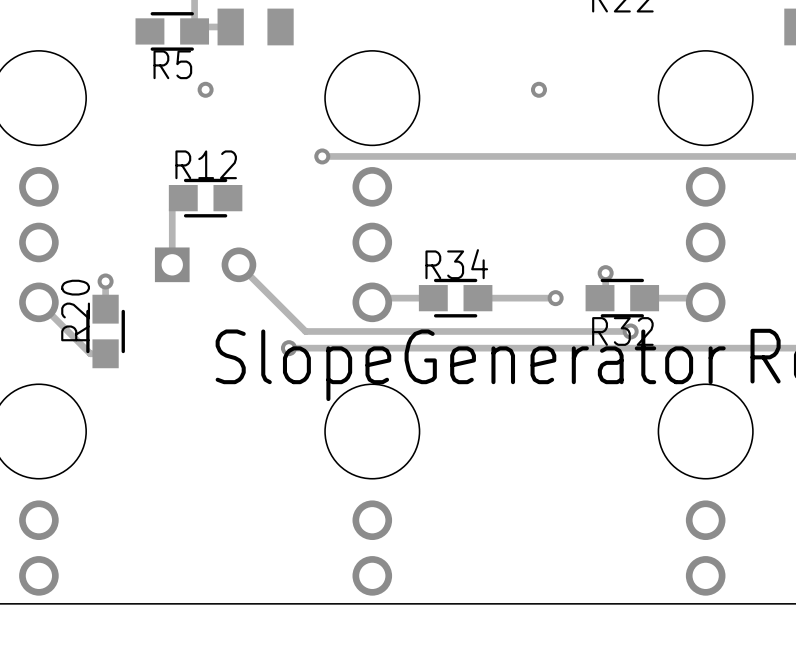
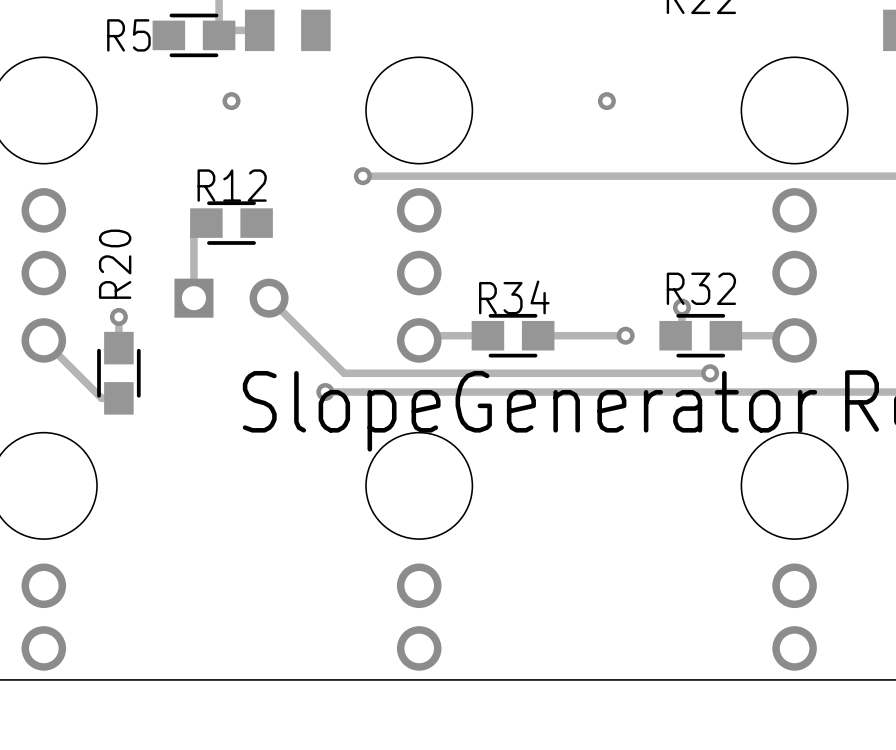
R5 name position: R5 (172, 64) -> R5 (128, 35)
R20 name position: R20 (75, 310) -> R20 (115, 264)
R32 name position: R32 (622, 331) -> R32 (701, 288)

